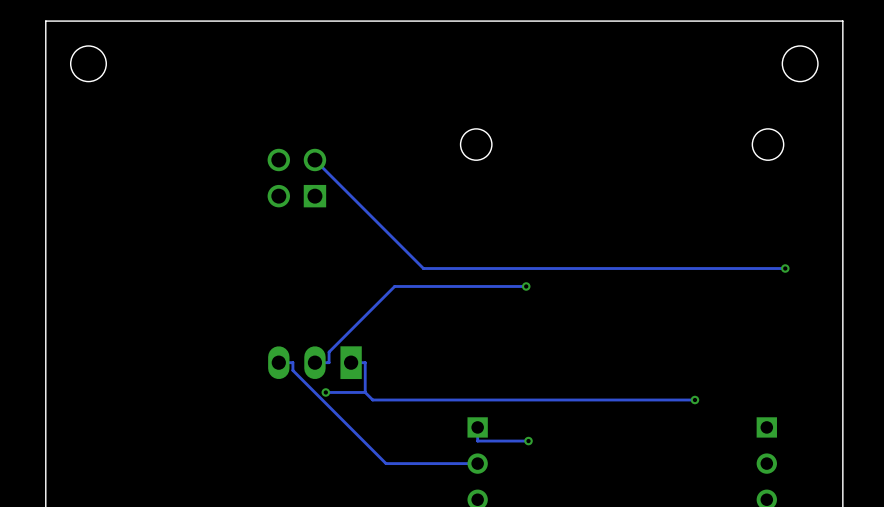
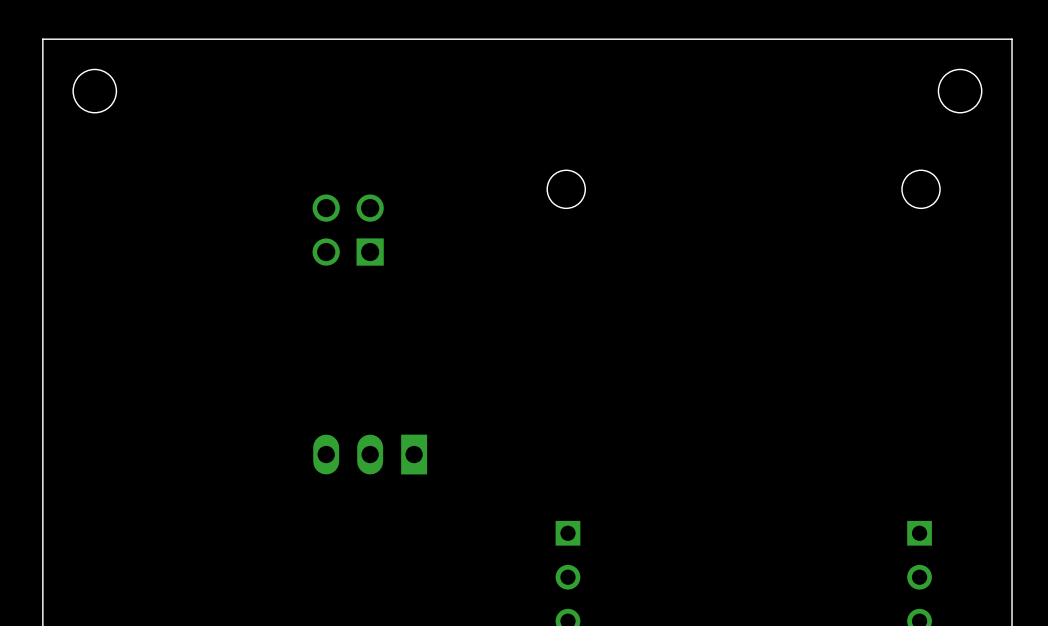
track: (314, 159) (423, 268) (785, 268) -> none
via: (785, 268) -> none
track: (526, 286) (394, 286) (329, 352) (329, 362) (314, 362) -> none
via: (526, 286) -> none
track: (278, 362) (292, 362) (292, 370) (386, 463) (477, 463) -> none
track: (351, 362) (365, 362) (365, 392) -> none
via: (325, 392) -> none
track: (365, 392) (325, 392) -> none
track: (365, 392) (372, 400) (694, 400) -> none
via: (694, 400) -> none
track: (477, 427) (477, 441) (528, 441) -> none
via: (528, 441) -> none

